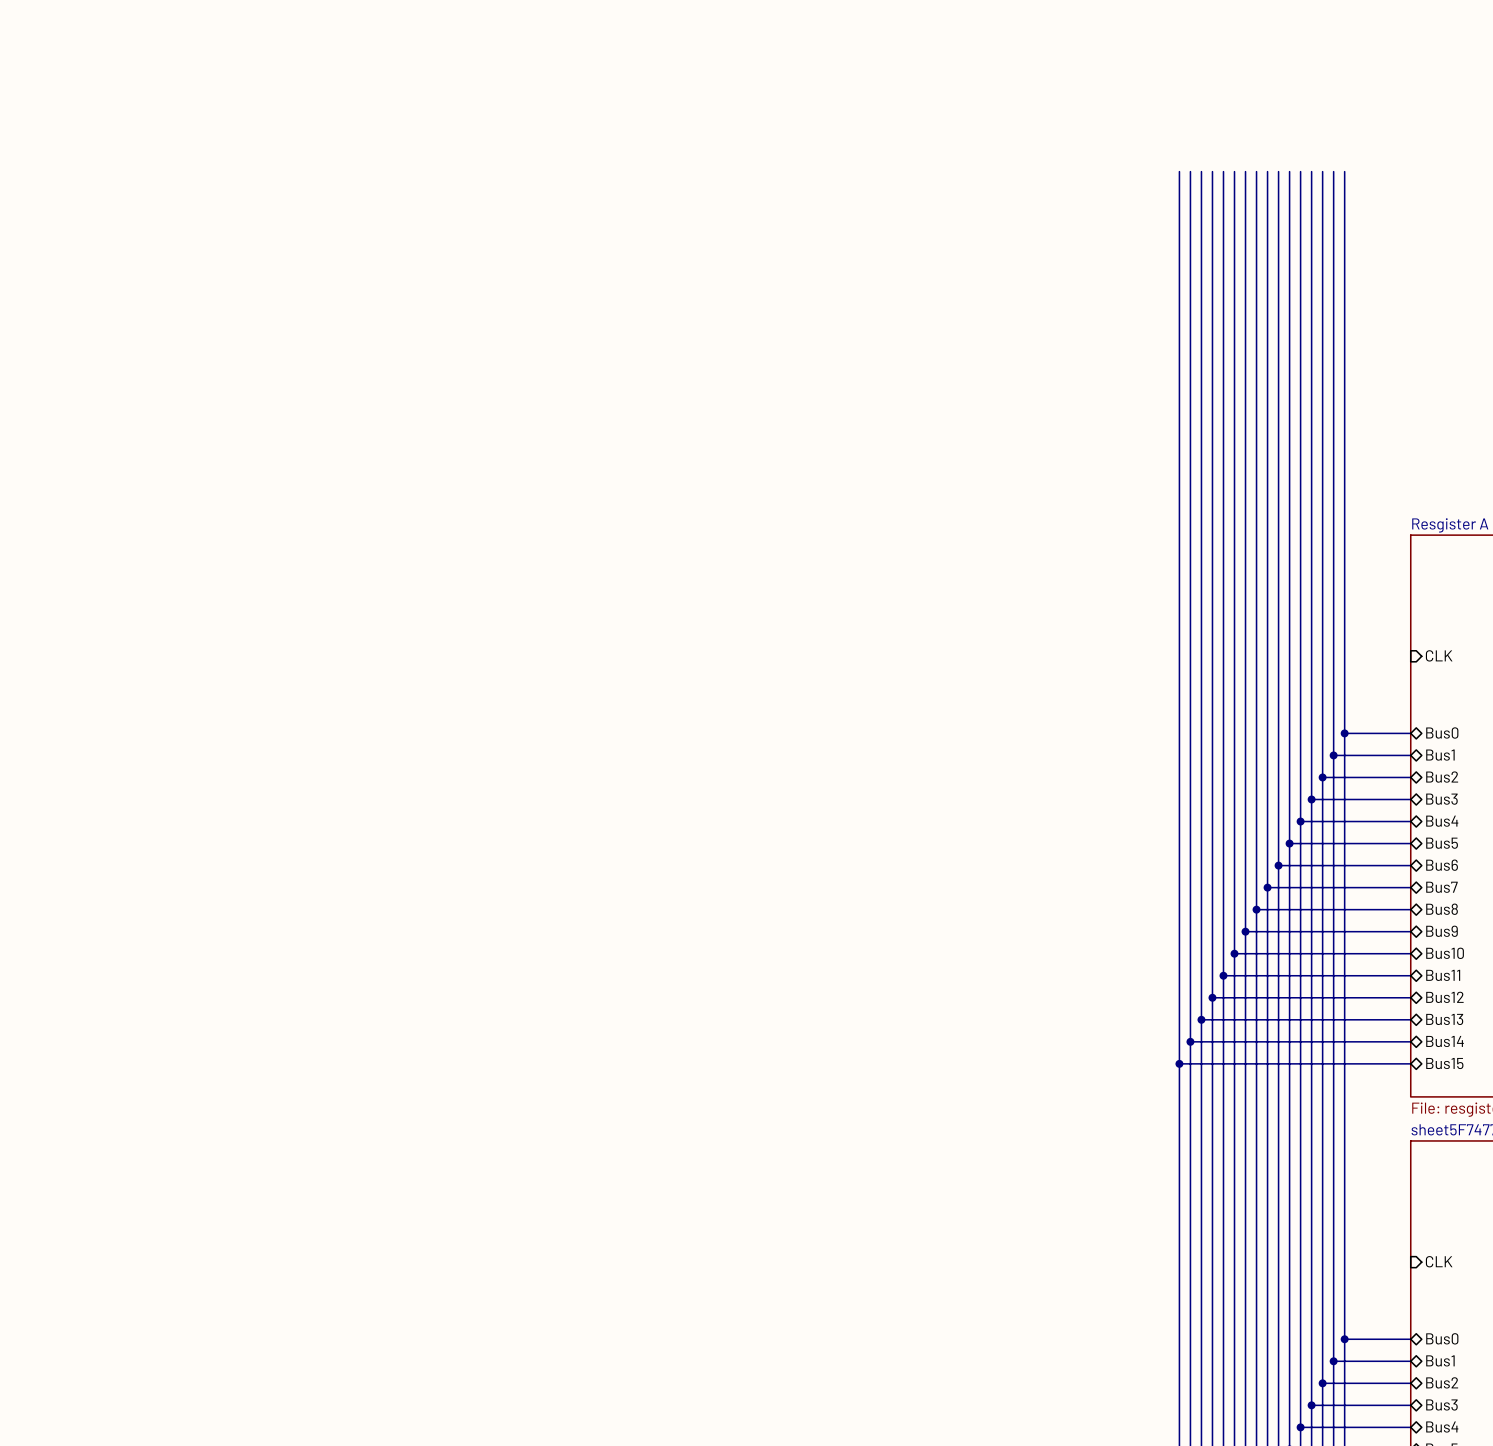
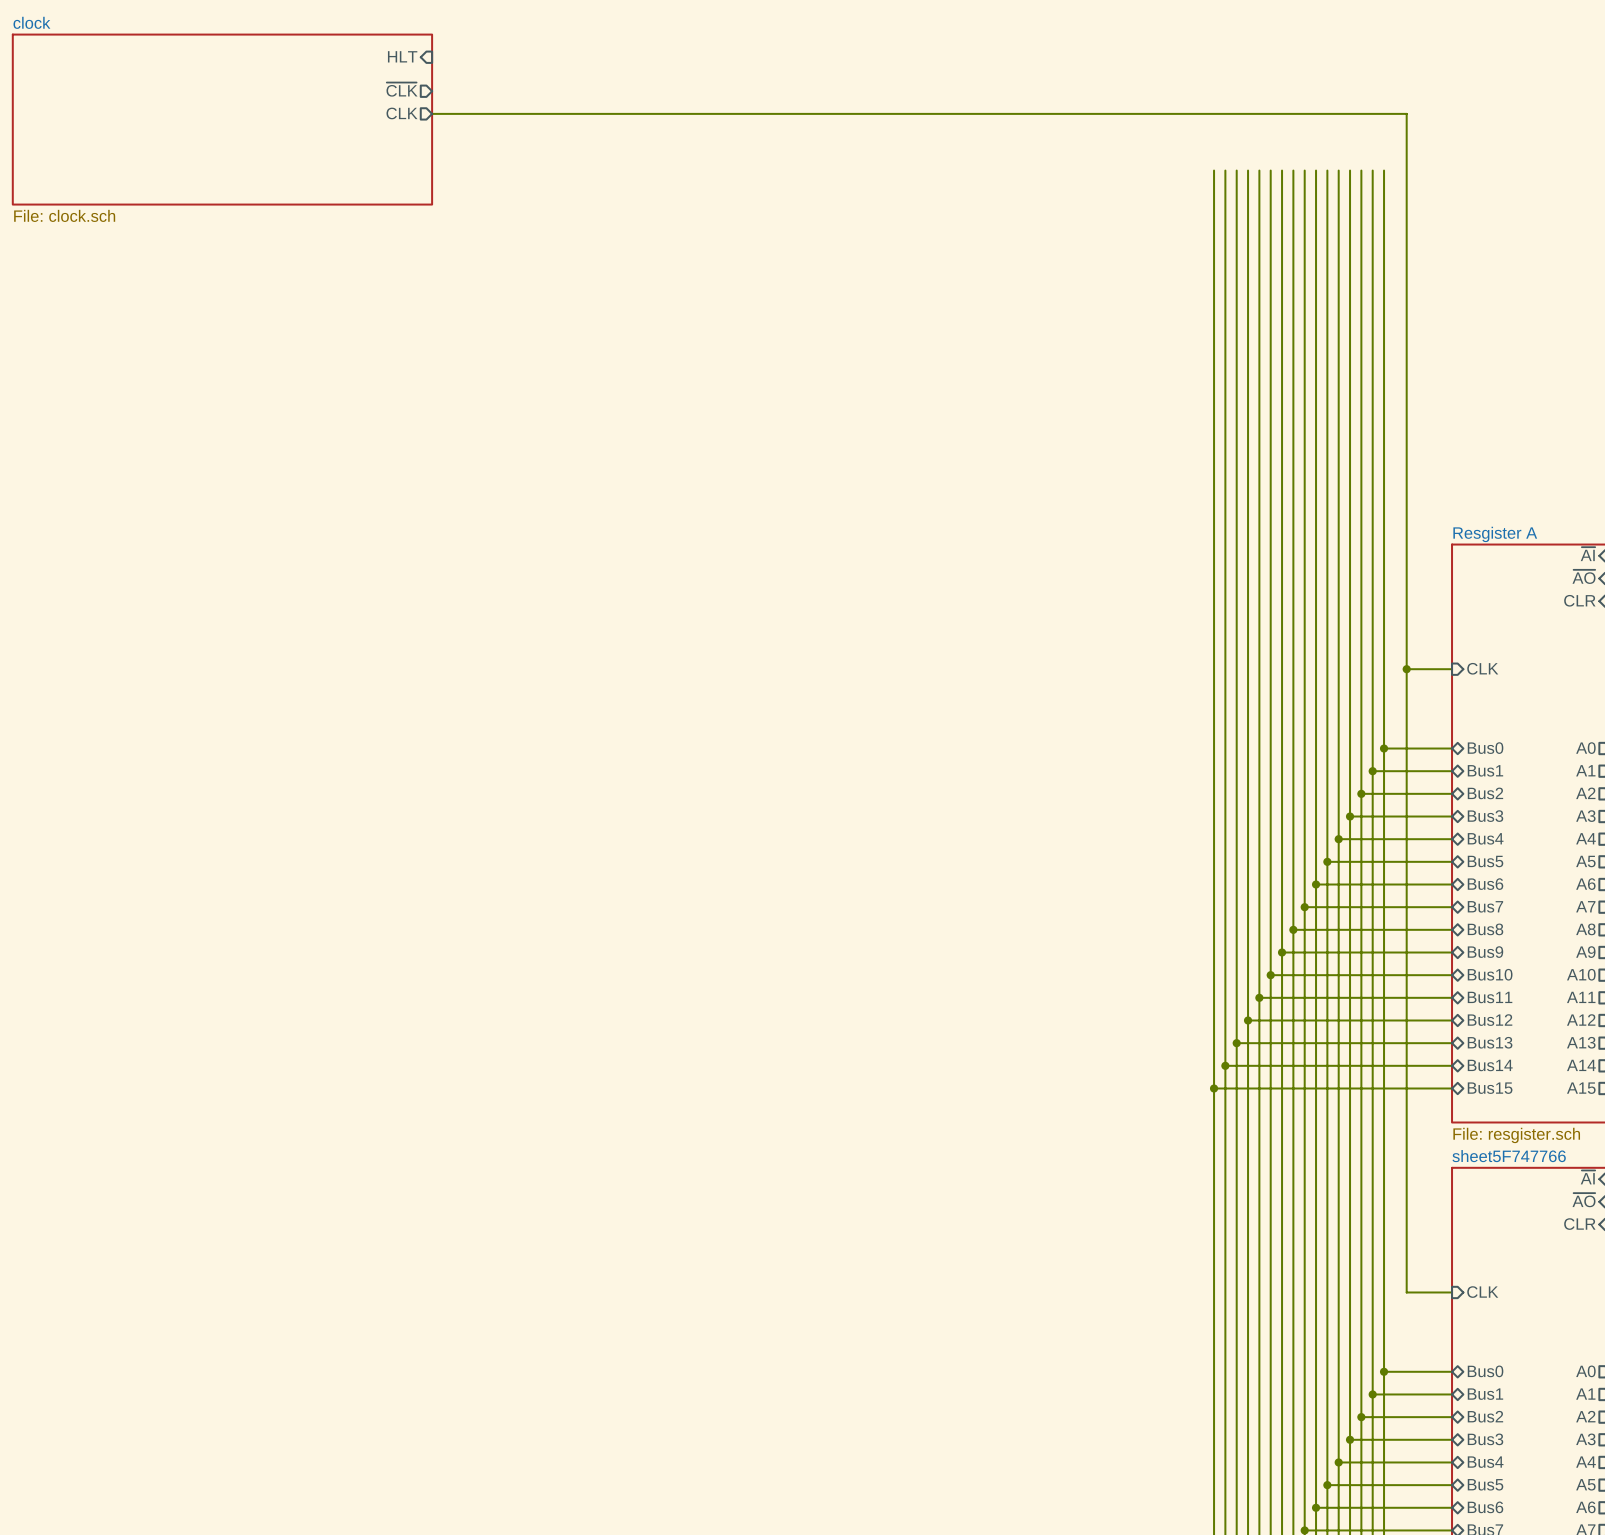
sheet pin: none -> HLT (402, 56)
sheet pin: none -> ~{CLK} (402, 89)
sheet pin: none -> CLK (402, 113)
wire: none -> (432, 113) (1406, 113) (1406, 1292) (1452, 1292)
sheet clock: none -> File: clock.sch (222, 119)
wire: none -> (1406, 669) (1452, 669)
junction: none -> (1406, 669)

